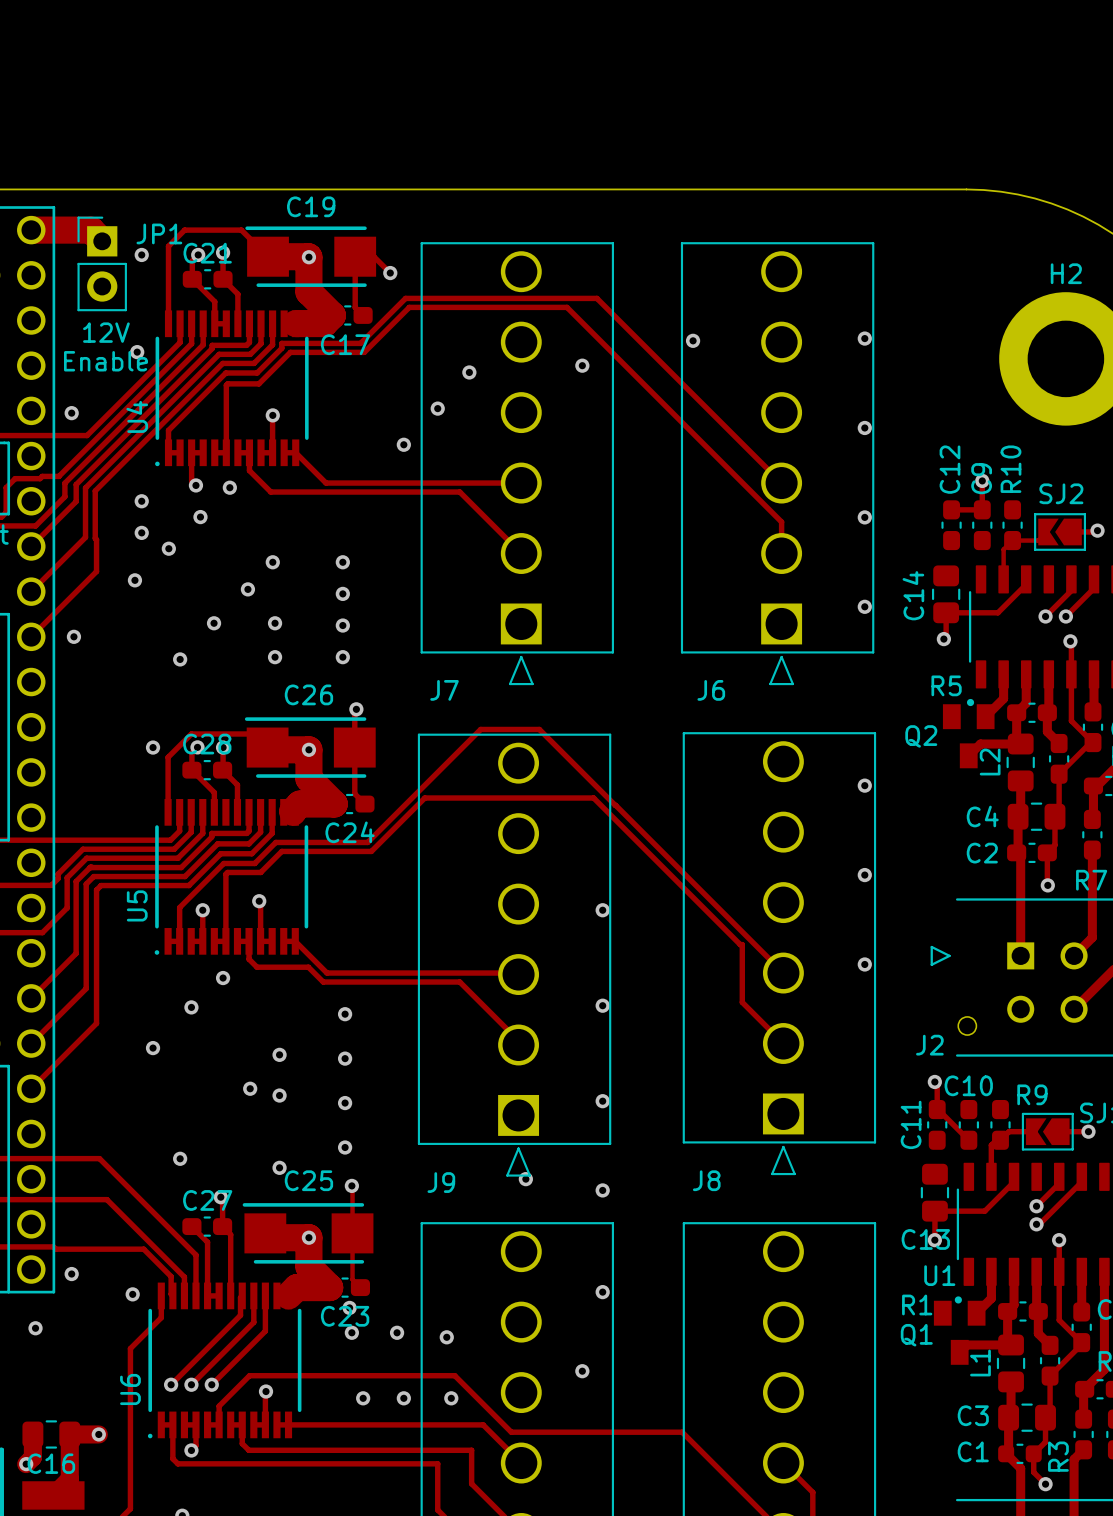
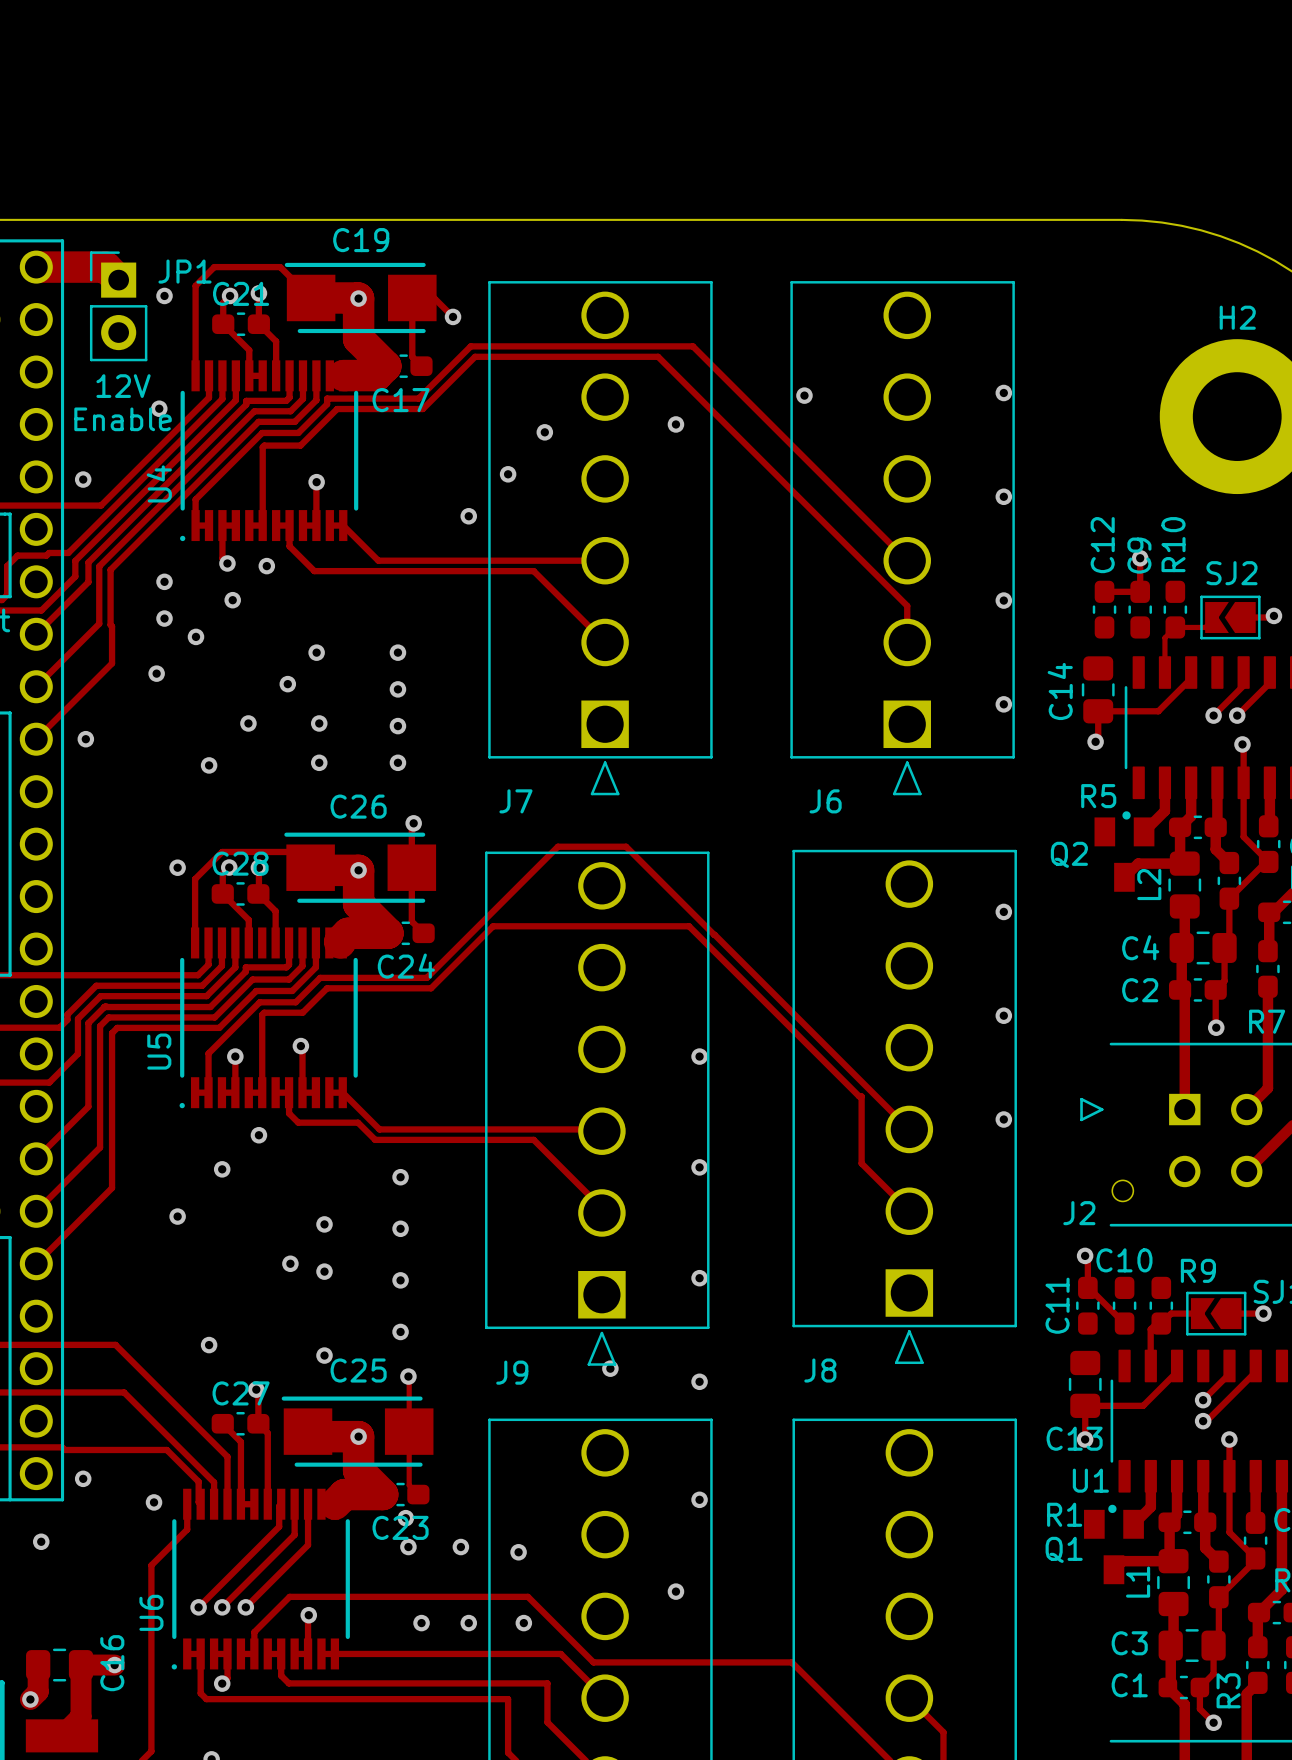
C16 name rotation: 0° (51, 1463) -> 90° counterclockwise (112, 1663)

